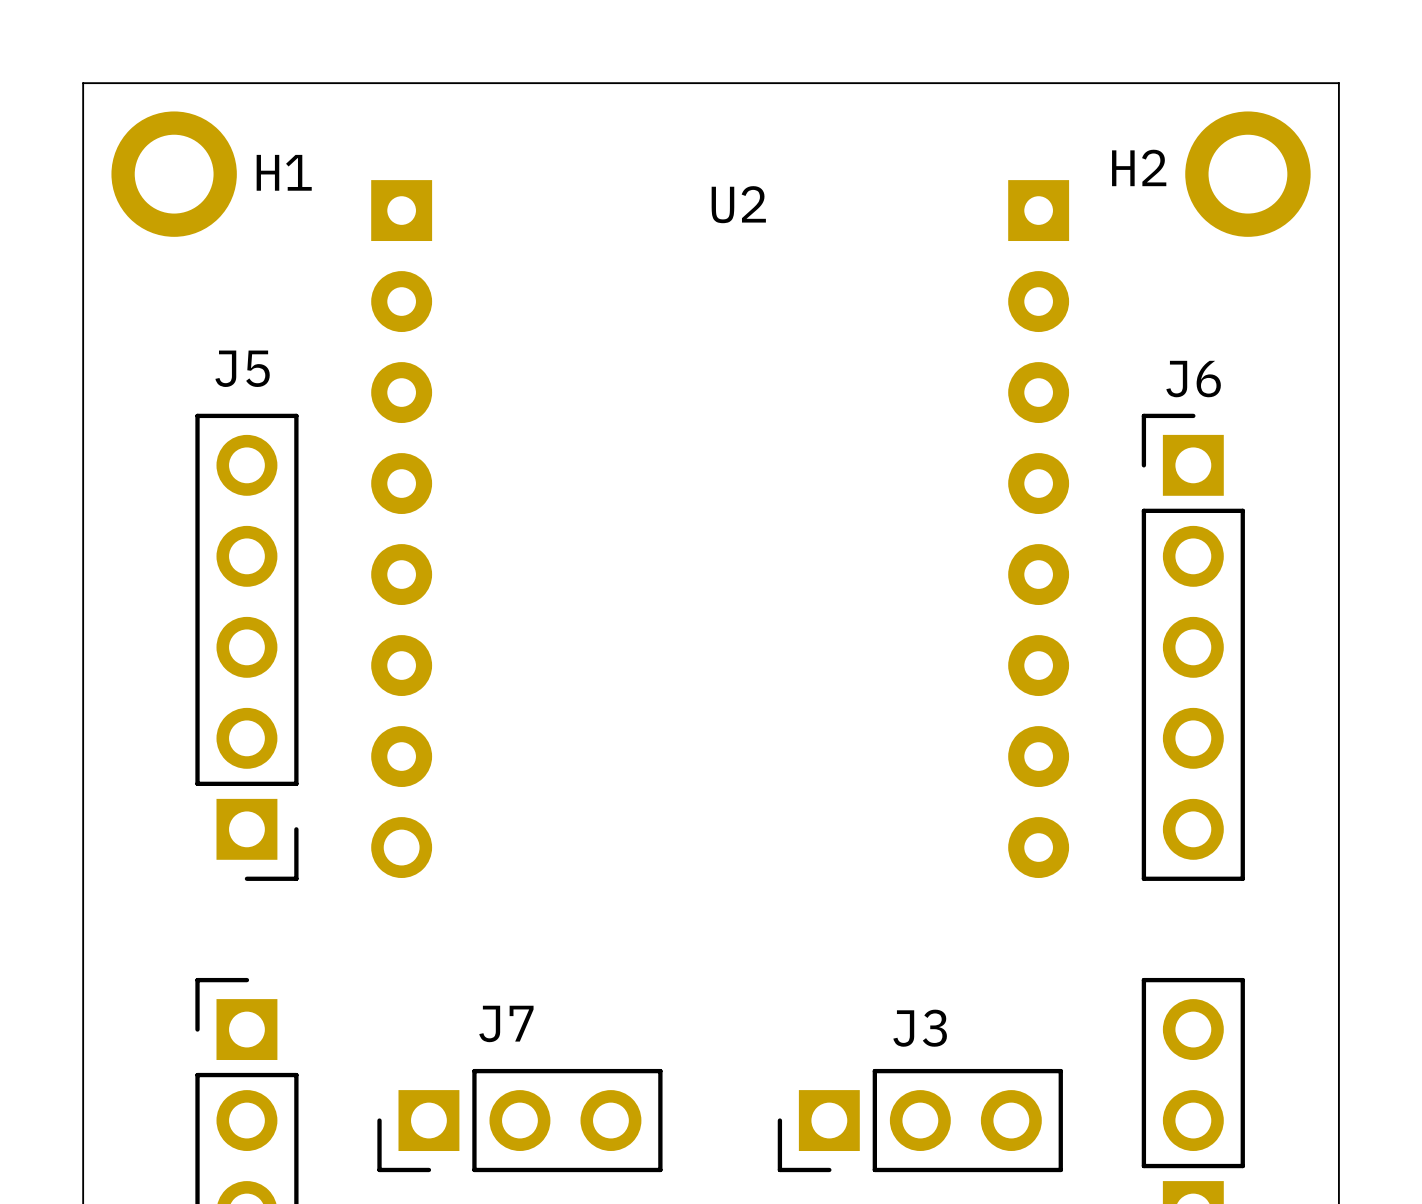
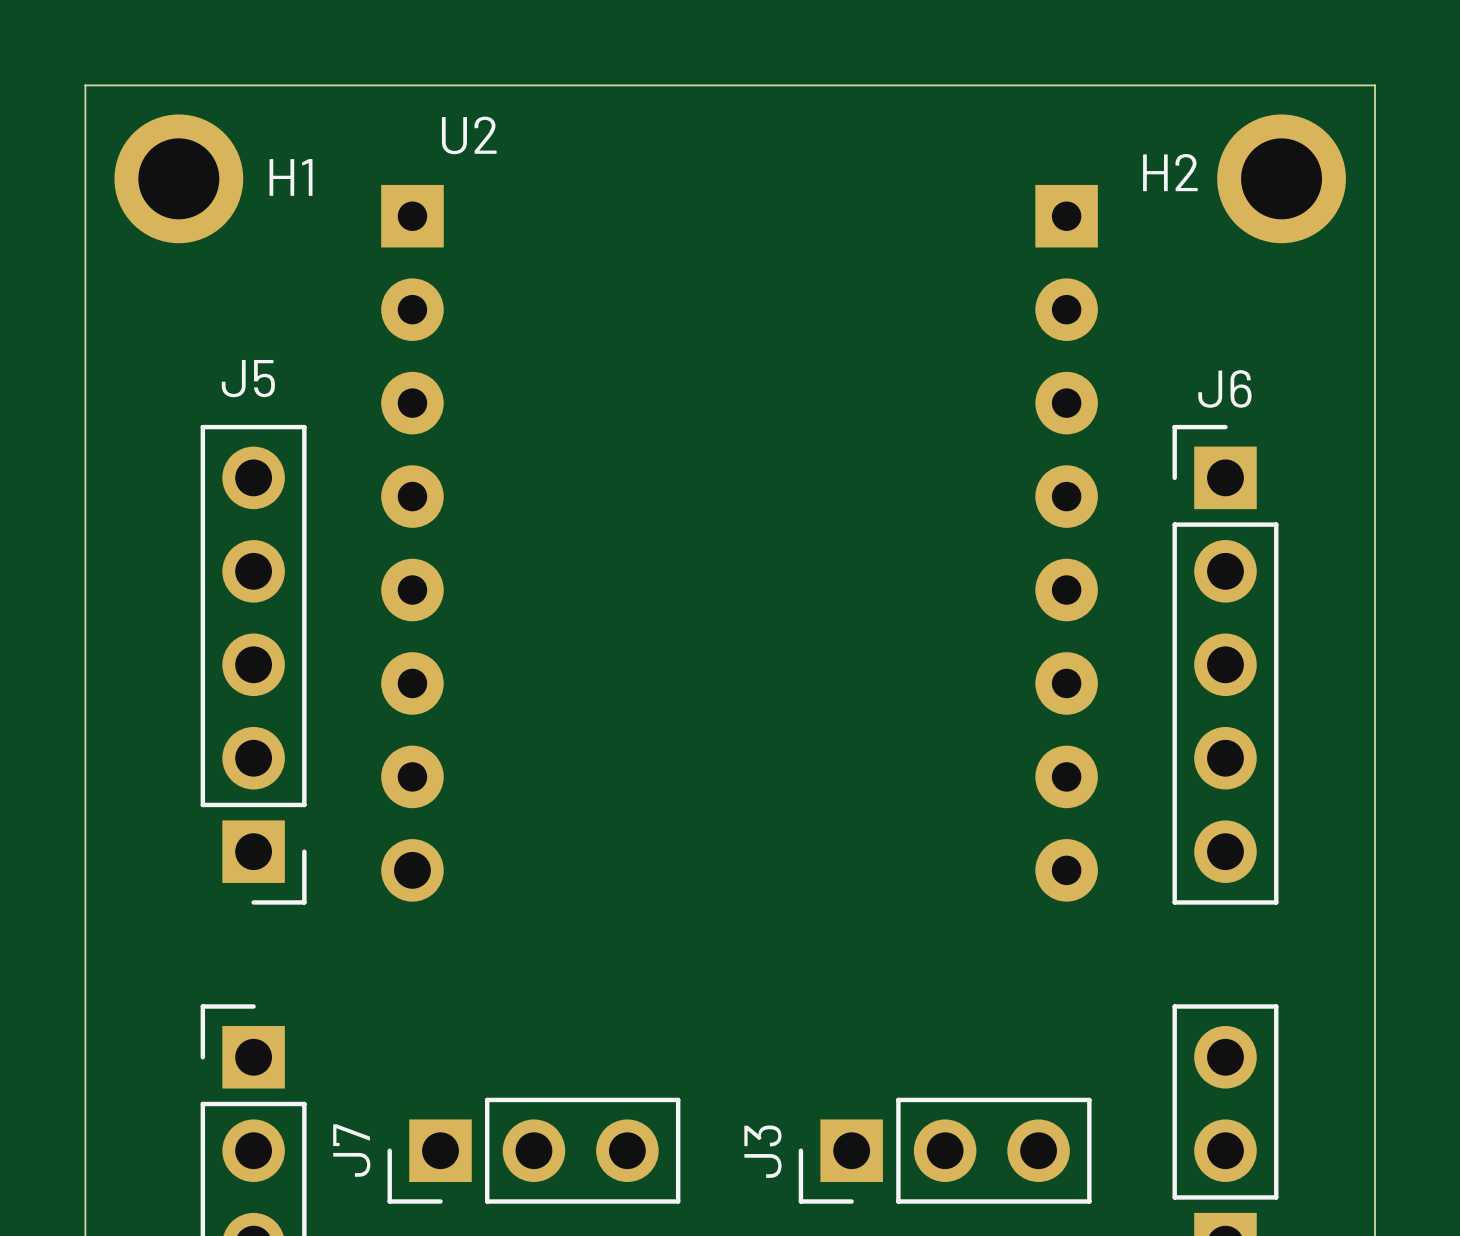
U2 name position: U2 (738, 204) -> U2 (469, 135)
J7 name rotation: 0° (506, 1023) -> 90° counterclockwise (351, 1150)
J7 name position: J7 (506, 1023) -> J7 (351, 1150)
J3 name rotation: 0° (920, 1028) -> 90° counterclockwise (762, 1151)
J3 name position: J3 (920, 1028) -> J3 (762, 1151)

